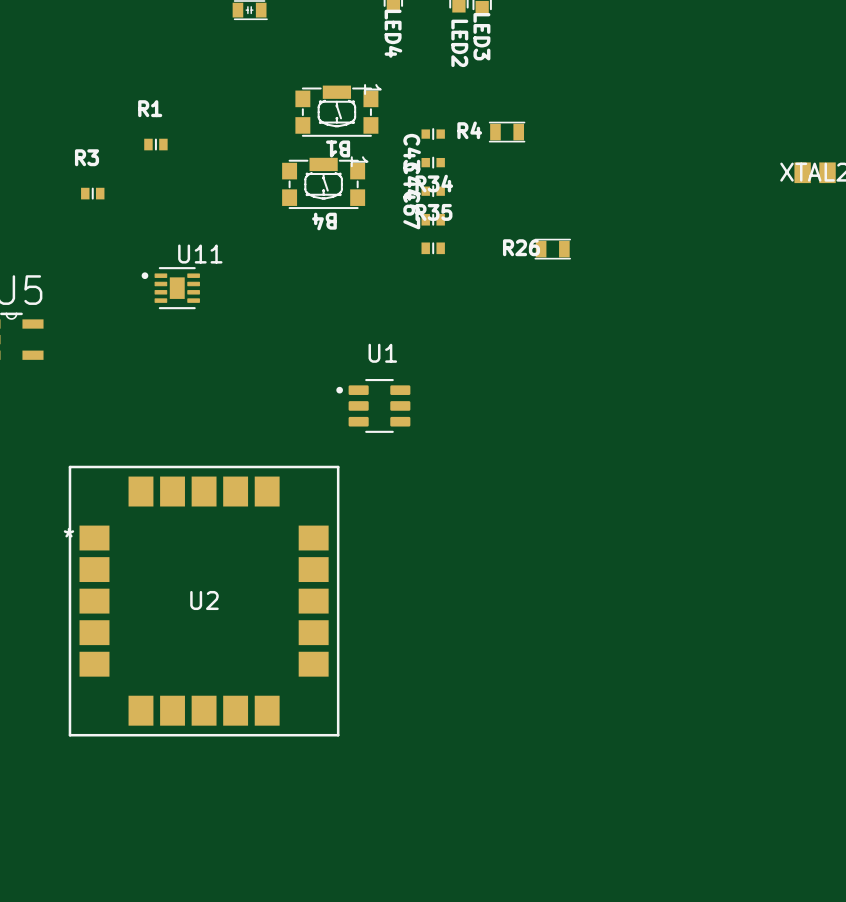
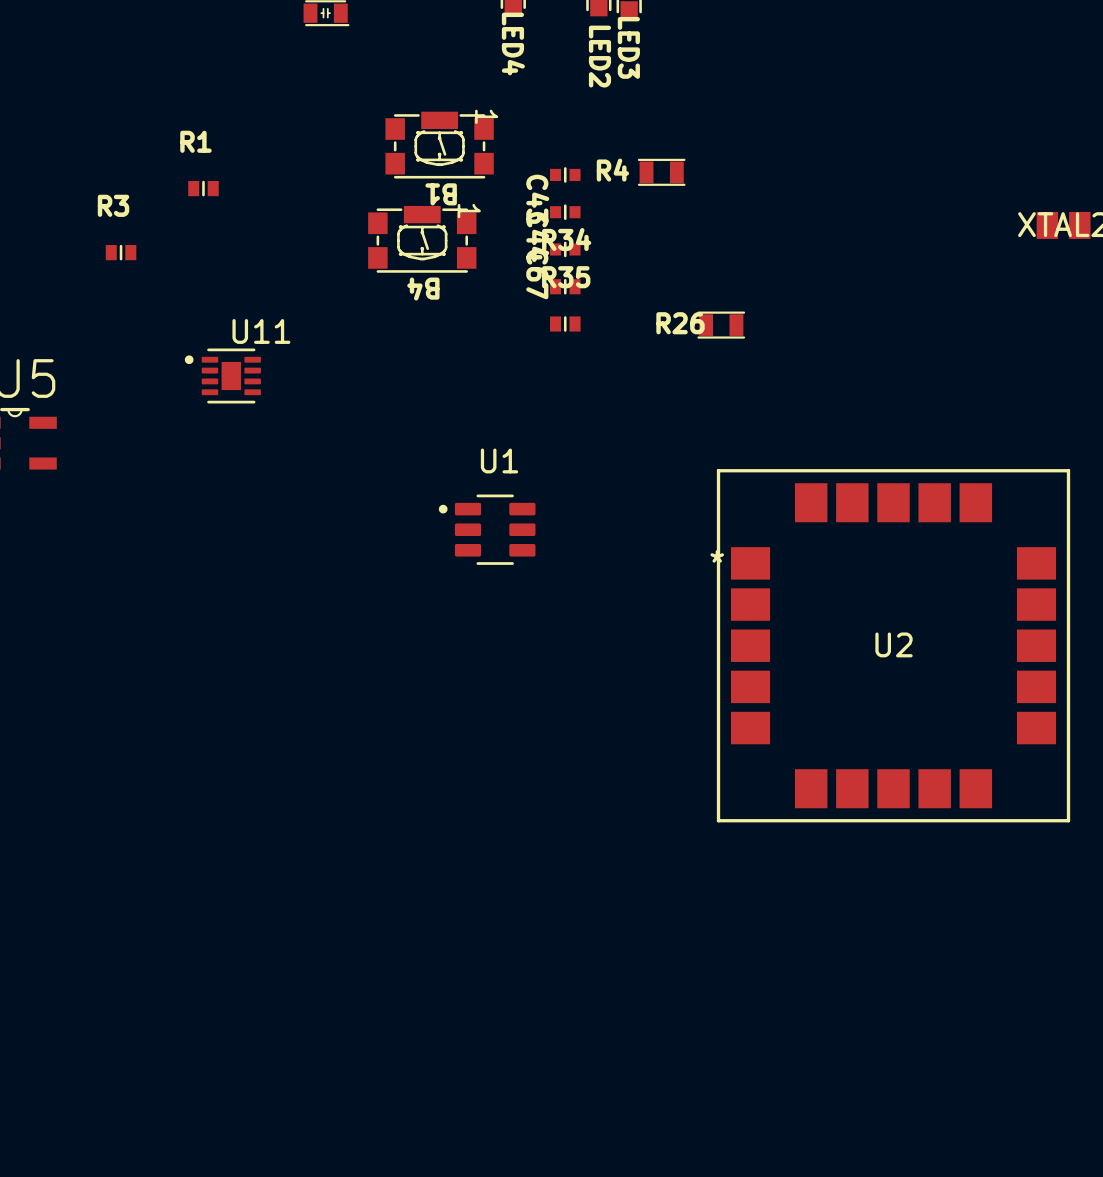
U2 position: (204, 601) -> (893, 645)

